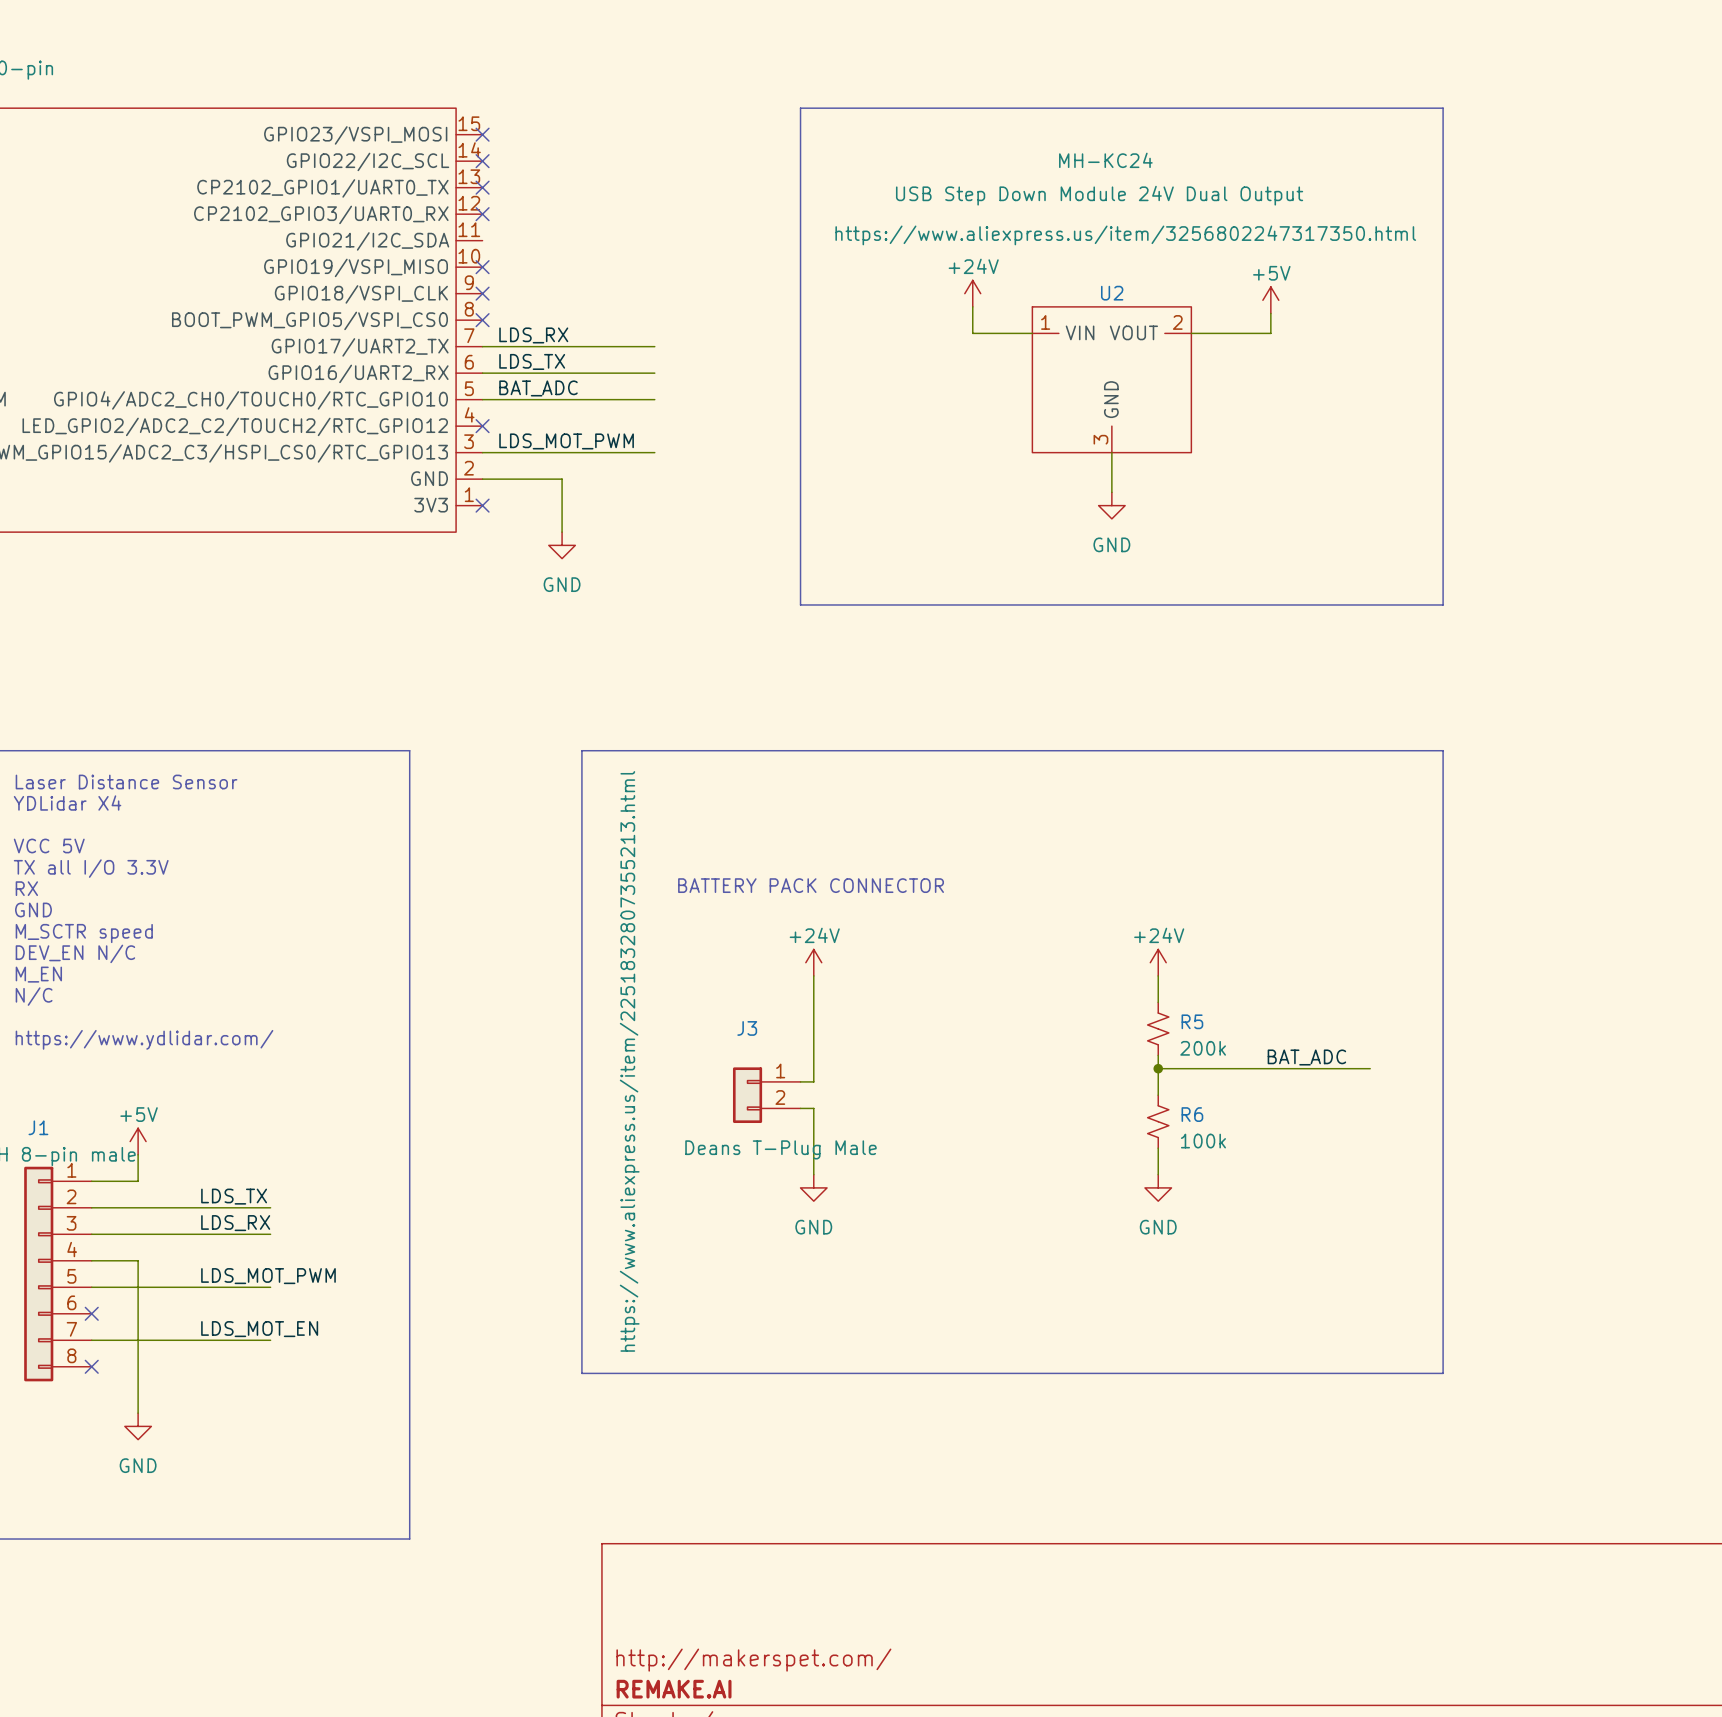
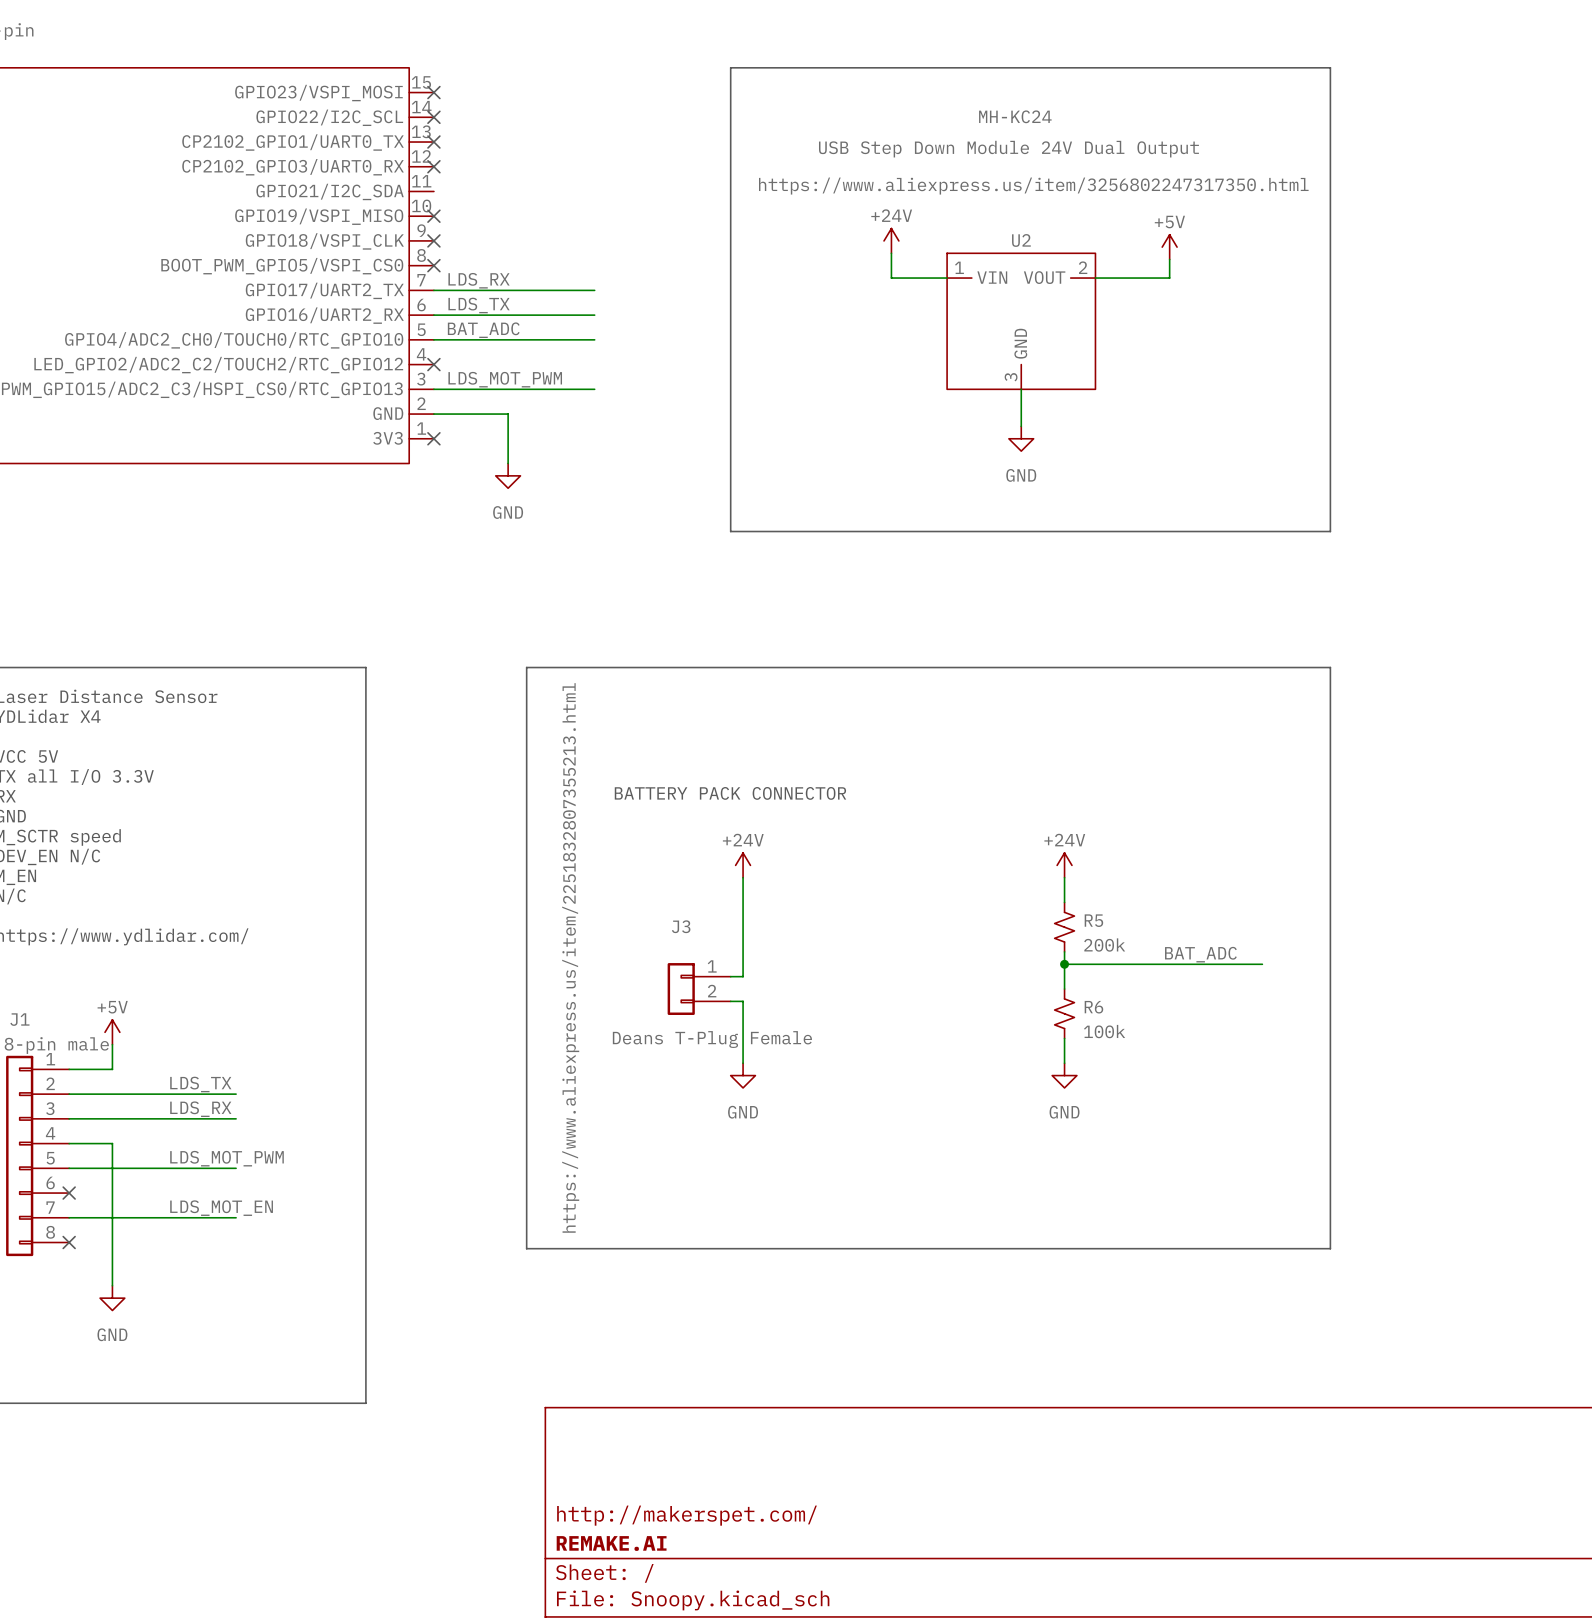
J3 value: Deans T-Plug Male (780, 1149) -> Deans T-Plug Female (712, 1039)

